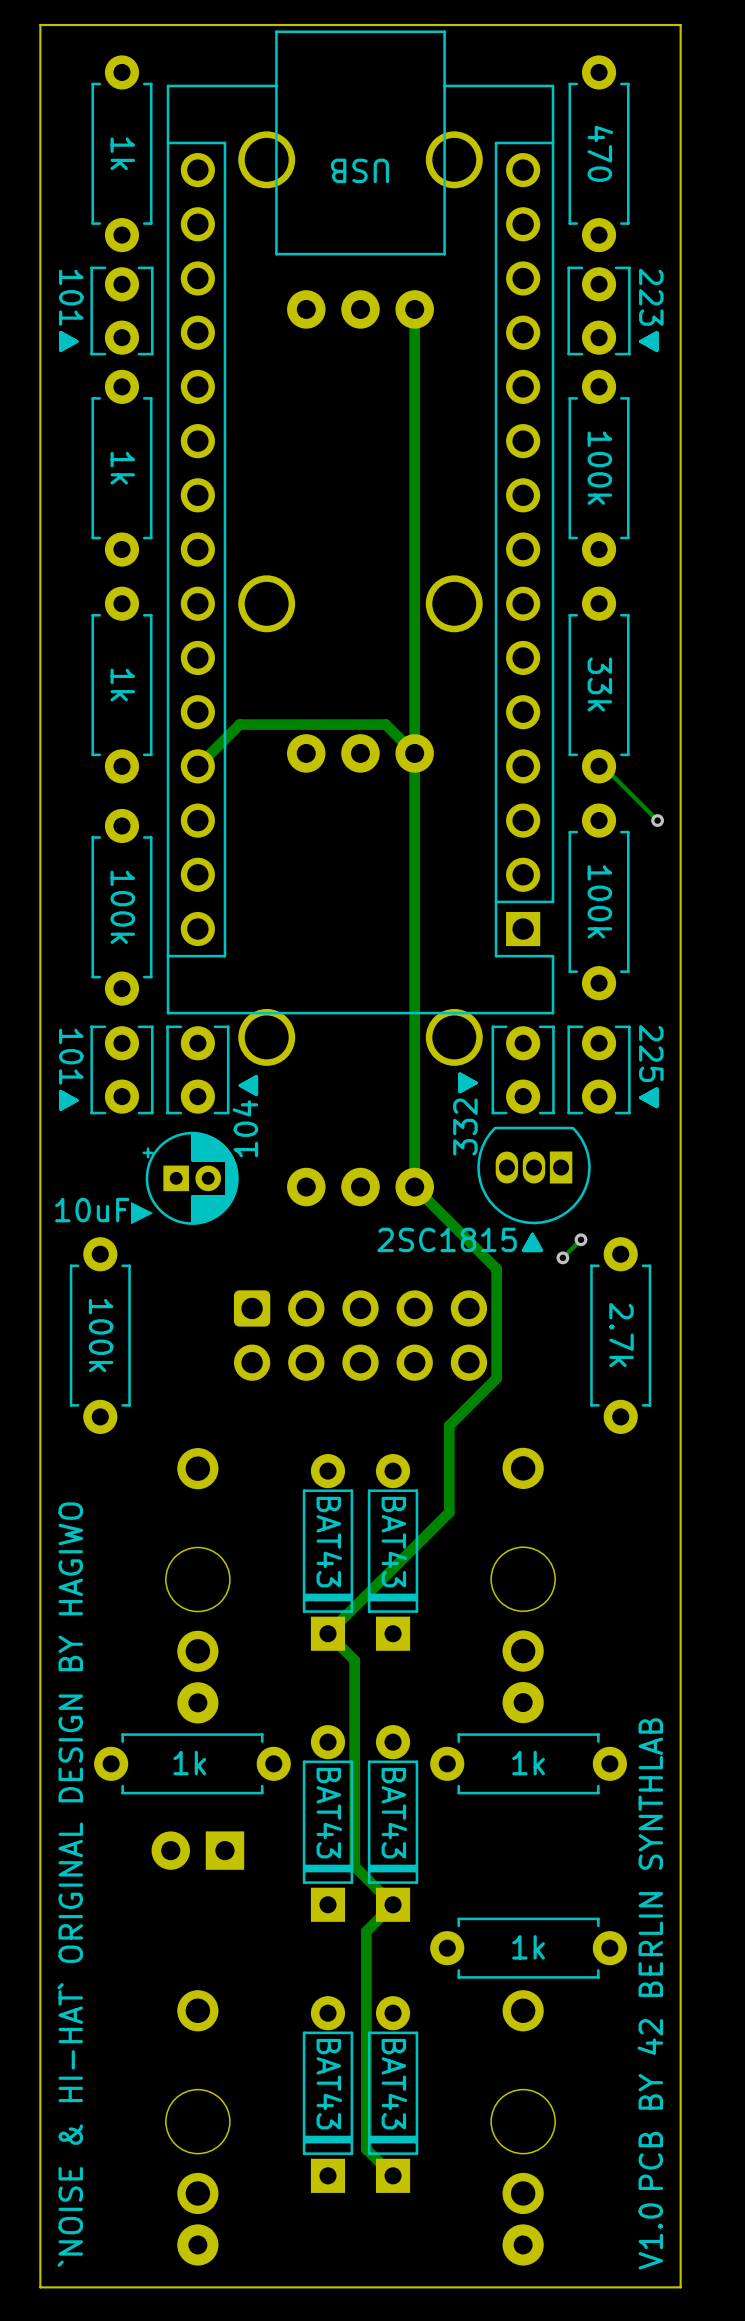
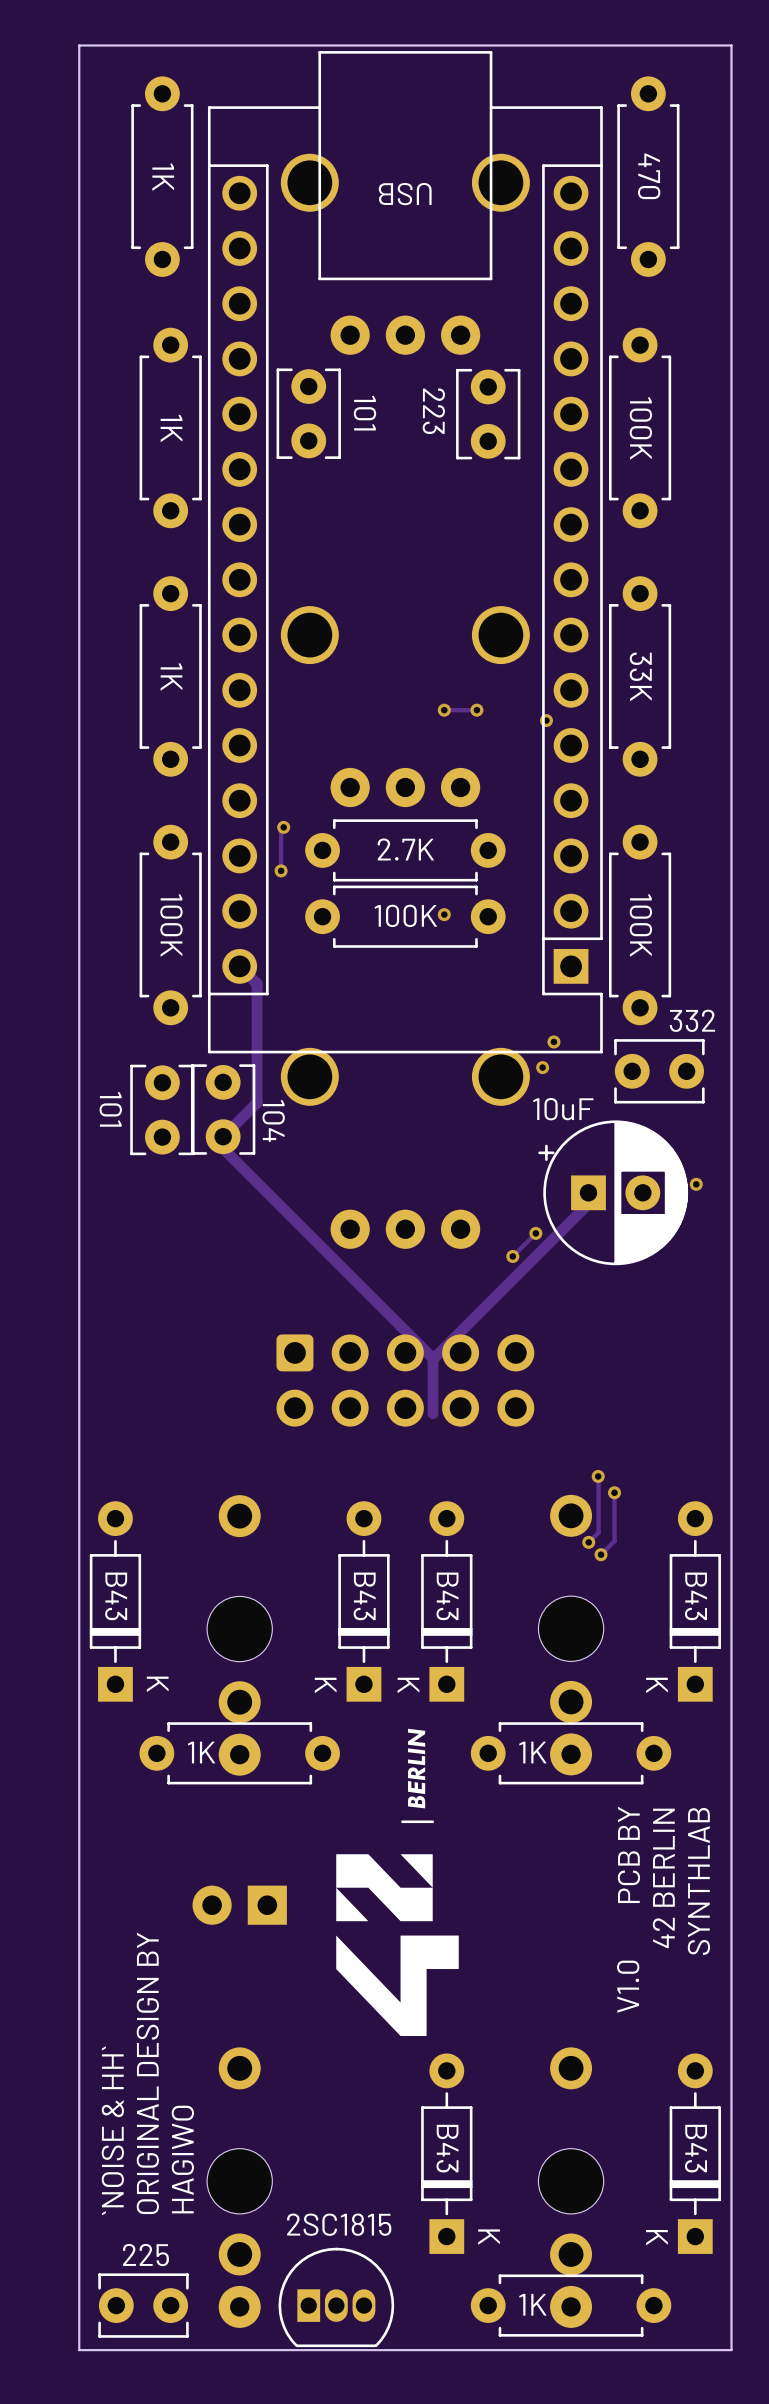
part value: 1k (122, 153) -> 1K (163, 177)
track: (414, 309) (414, 1187) (496, 1268) (496, 1378) (449, 1425) (449, 1512) (327, 1633) (354, 1660) (354, 1866) (393, 1904) (366, 1931) (366, 2149) (393, 2175) -> none
part: (121, 310) -> none
part: (599, 310) -> none
part: none -> 101 (308, 413)
part: none -> 223 (488, 414)
part: none -> 1K (170, 427)
part: none -> 100K (640, 427)
part: 1k (121, 468) -> none
part: 100k (599, 468) -> none
part: none -> 1K (170, 676)
part: none -> 33K (640, 676)
via: none -> (444, 710)
track: none -> (476, 710) (444, 710)
via: none -> (476, 710)
part: 1k (121, 685) -> none
part: 33k (599, 685) -> none
via: none -> (546, 720)
track: (414, 753) (385, 724) (239, 724) (197, 766) -> none
track: (599, 766) (603, 766) (657, 820) -> none
track: none -> (283, 827) (281, 829) (281, 870)
via: none -> (283, 827)
part: none -> 2.7K (405, 850)
via: (657, 820) -> none
via: none -> (281, 870)
via: none -> (444, 914)
part: none -> 100K (405, 916)
part position: (599, 901) -> (640, 924)
part value: 100k (599, 901) -> 100K (640, 925)
part position: (121, 907) -> (170, 924)
part value: 100k (122, 907) -> 100K (171, 925)
track: none -> (239, 966) (257, 983) (257, 1102) (223, 1136) (223, 1148) (433, 1358)
via: none -> (553, 1041)
via: none -> (542, 1067)
part: none -> 332 (659, 1071)
part text: 101▲ (71, 1069) -> none
part value: none -> 101 (110, 1109)
part position: (197, 1069) -> (223, 1109)
part: (523, 1069) -> none
part: (599, 1069) -> none
part value: none -> 104 (273, 1120)
part text: 104▲ (245, 1116) -> none
via: none -> (696, 1184)
track: none -> (588, 1192) (588, 1203) (433, 1358)
part: none -> 10uF (613, 1192)
part: (533, 1175) -> none
part: (190, 1178) -> none
track: none -> (535, 1233) (512, 1256)
via: none -> (535, 1233)
via: none -> (512, 1256)
track: (580, 1239) (562, 1257) -> none
via: (580, 1239) -> none
via: (562, 1257) -> none
track: none -> (433, 1358) (433, 1413)
part: 100k (100, 1335) -> none
part: 2.7k (620, 1335) -> none
track: none -> (598, 1476) (598, 1532) (588, 1542)
via: none -> (598, 1476)
track: none -> (614, 1492) (614, 1541) (601, 1554)
via: none -> (614, 1492)
part footprint: [302, 1454, 354, 1651] -> [338, 1501, 390, 1702]
part footprint: [367, 1454, 419, 1651] -> [421, 1501, 473, 1702]
via: none -> (588, 1542)
via: none -> (601, 1554)
part value: BAT43 (329, 1542) -> B43 (364, 1596)
part value: BAT43 (394, 1542) -> B43 (447, 1596)
part: none -> B43 (115, 1601)
part: none -> B43 (695, 1601)
drawing: none -> [401, 1728, 434, 1824]
part: none -> 1K (239, 1753)
part: none -> 1K (571, 1753)
part: 1k (192, 1763) -> none
part: 1k (528, 1763) -> none
drawing: none -> [336, 1854, 459, 2036]
text: none -> PCB BY (628, 1854)
part: BAT43 (327, 1823) -> none
part: BAT43 (393, 1823) -> none
text: none -> SYNTHLAB (698, 1881)
text: none -> 42 BERLIN (663, 1878)
text: `NOISE & HI-HAT` ORIGINAL DESIGN BY HAGIWO (70, 1884) -> none
part: 1k (528, 1948) -> none
text: PCB BY 42 BERLIN SYNTHLAB (650, 1954) -> none
text: none -> ORIGINAL DESIGN BY (147, 2073)
part footprint: [367, 1996, 419, 2193] -> [421, 2053, 473, 2254]
text: none -> `NOISE & HH` (112, 2130)
part value: BAT43 (394, 2084) -> B43 (447, 2148)
text: none -> HAGIWO (182, 2159)
part: BAT43 (327, 2094) -> none
part: none -> B43 (695, 2153)
part: none -> 2SC1815 (336, 2297)
text position: V1.0 (650, 2236) -> V1.0 (628, 1986)
part: none -> 225 (143, 2305)
part: none -> 1K (571, 2305)

